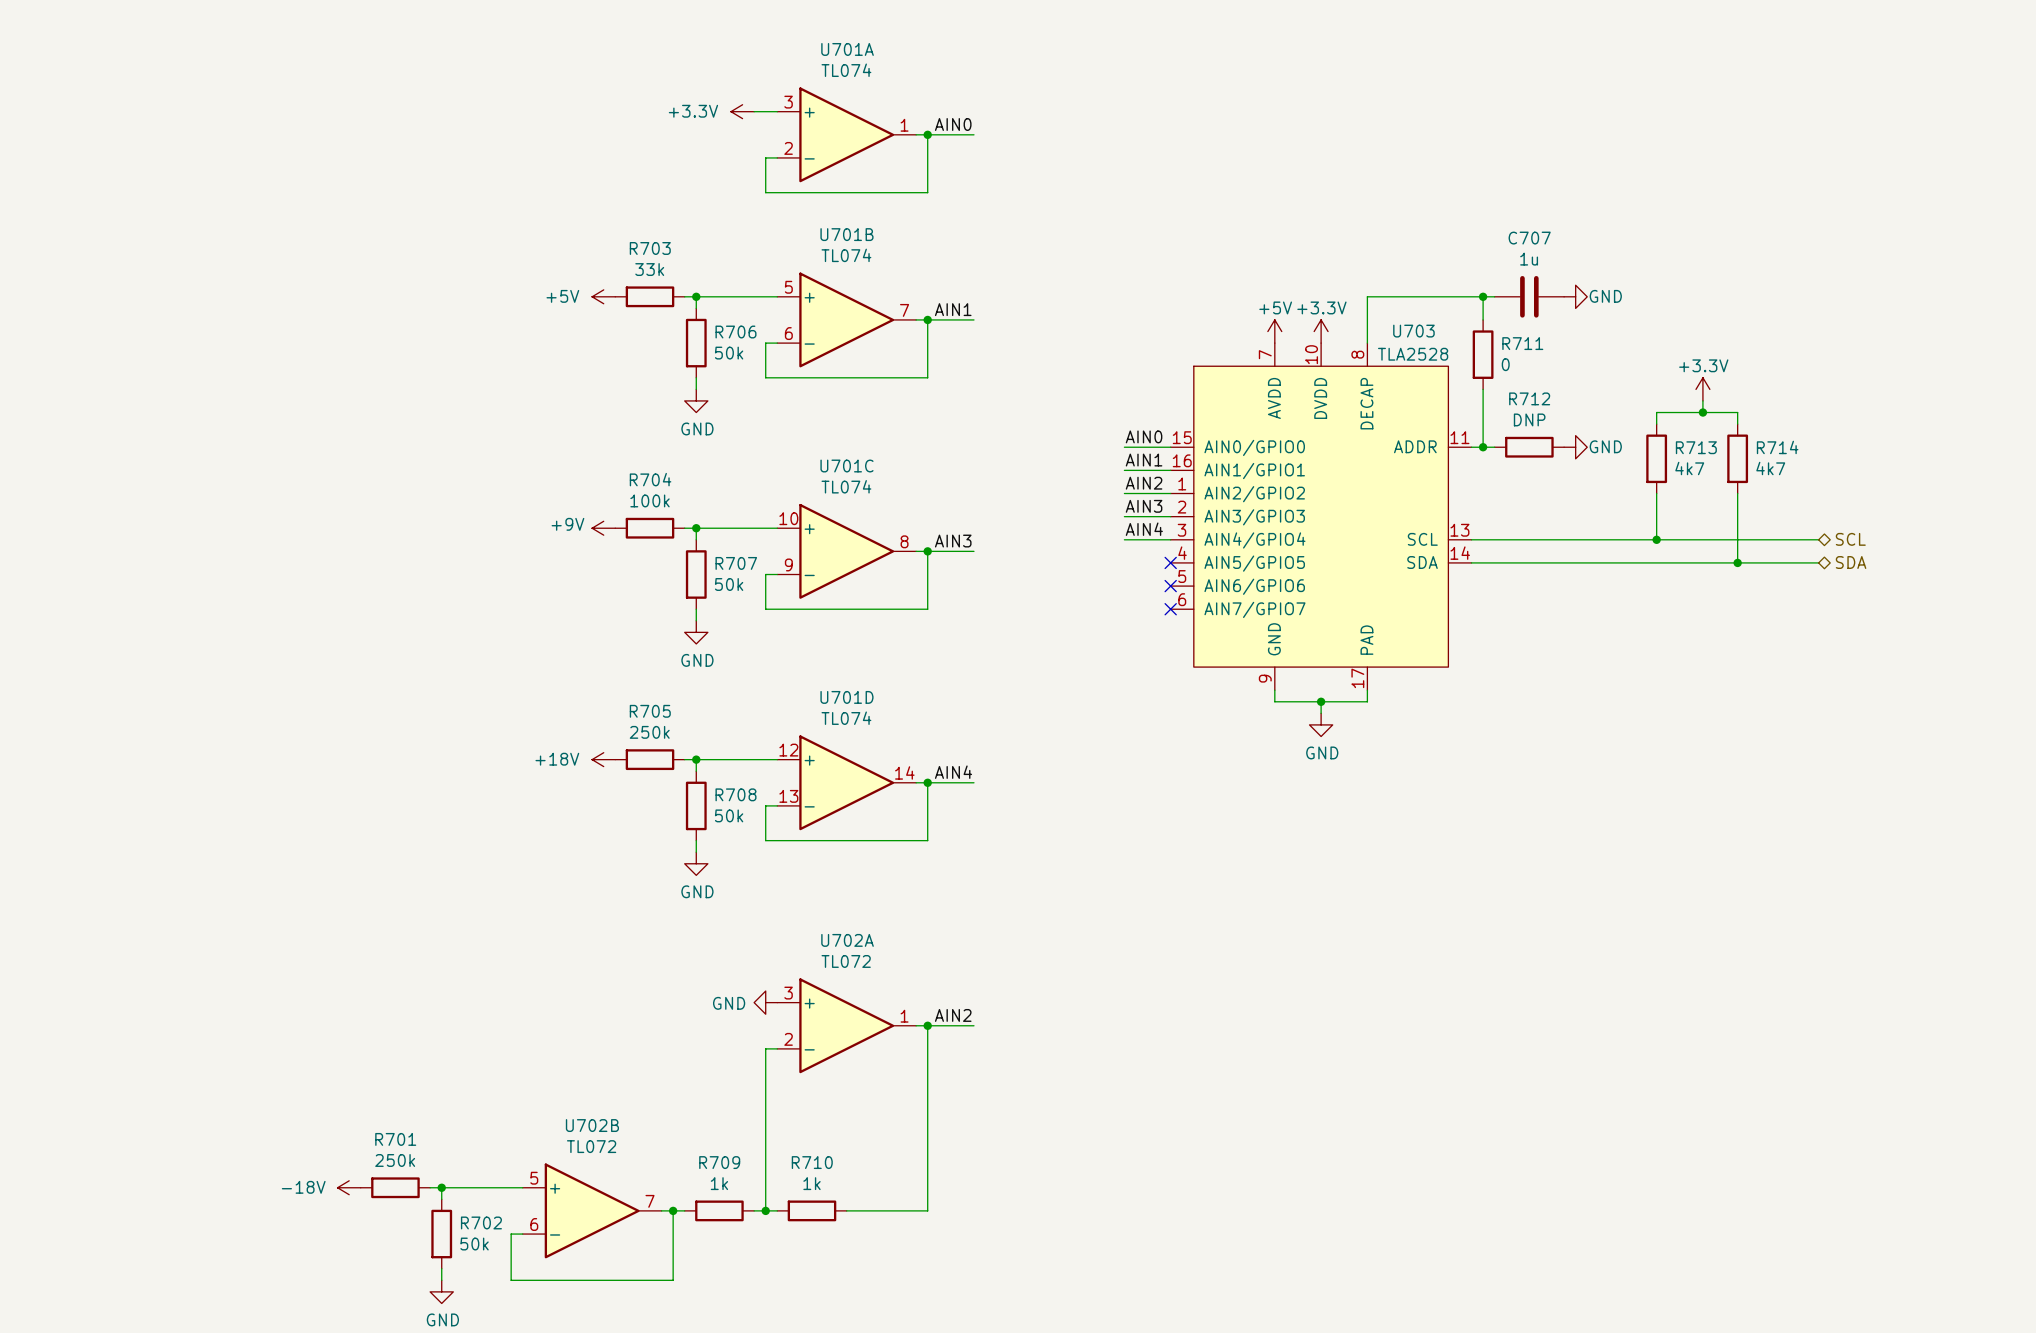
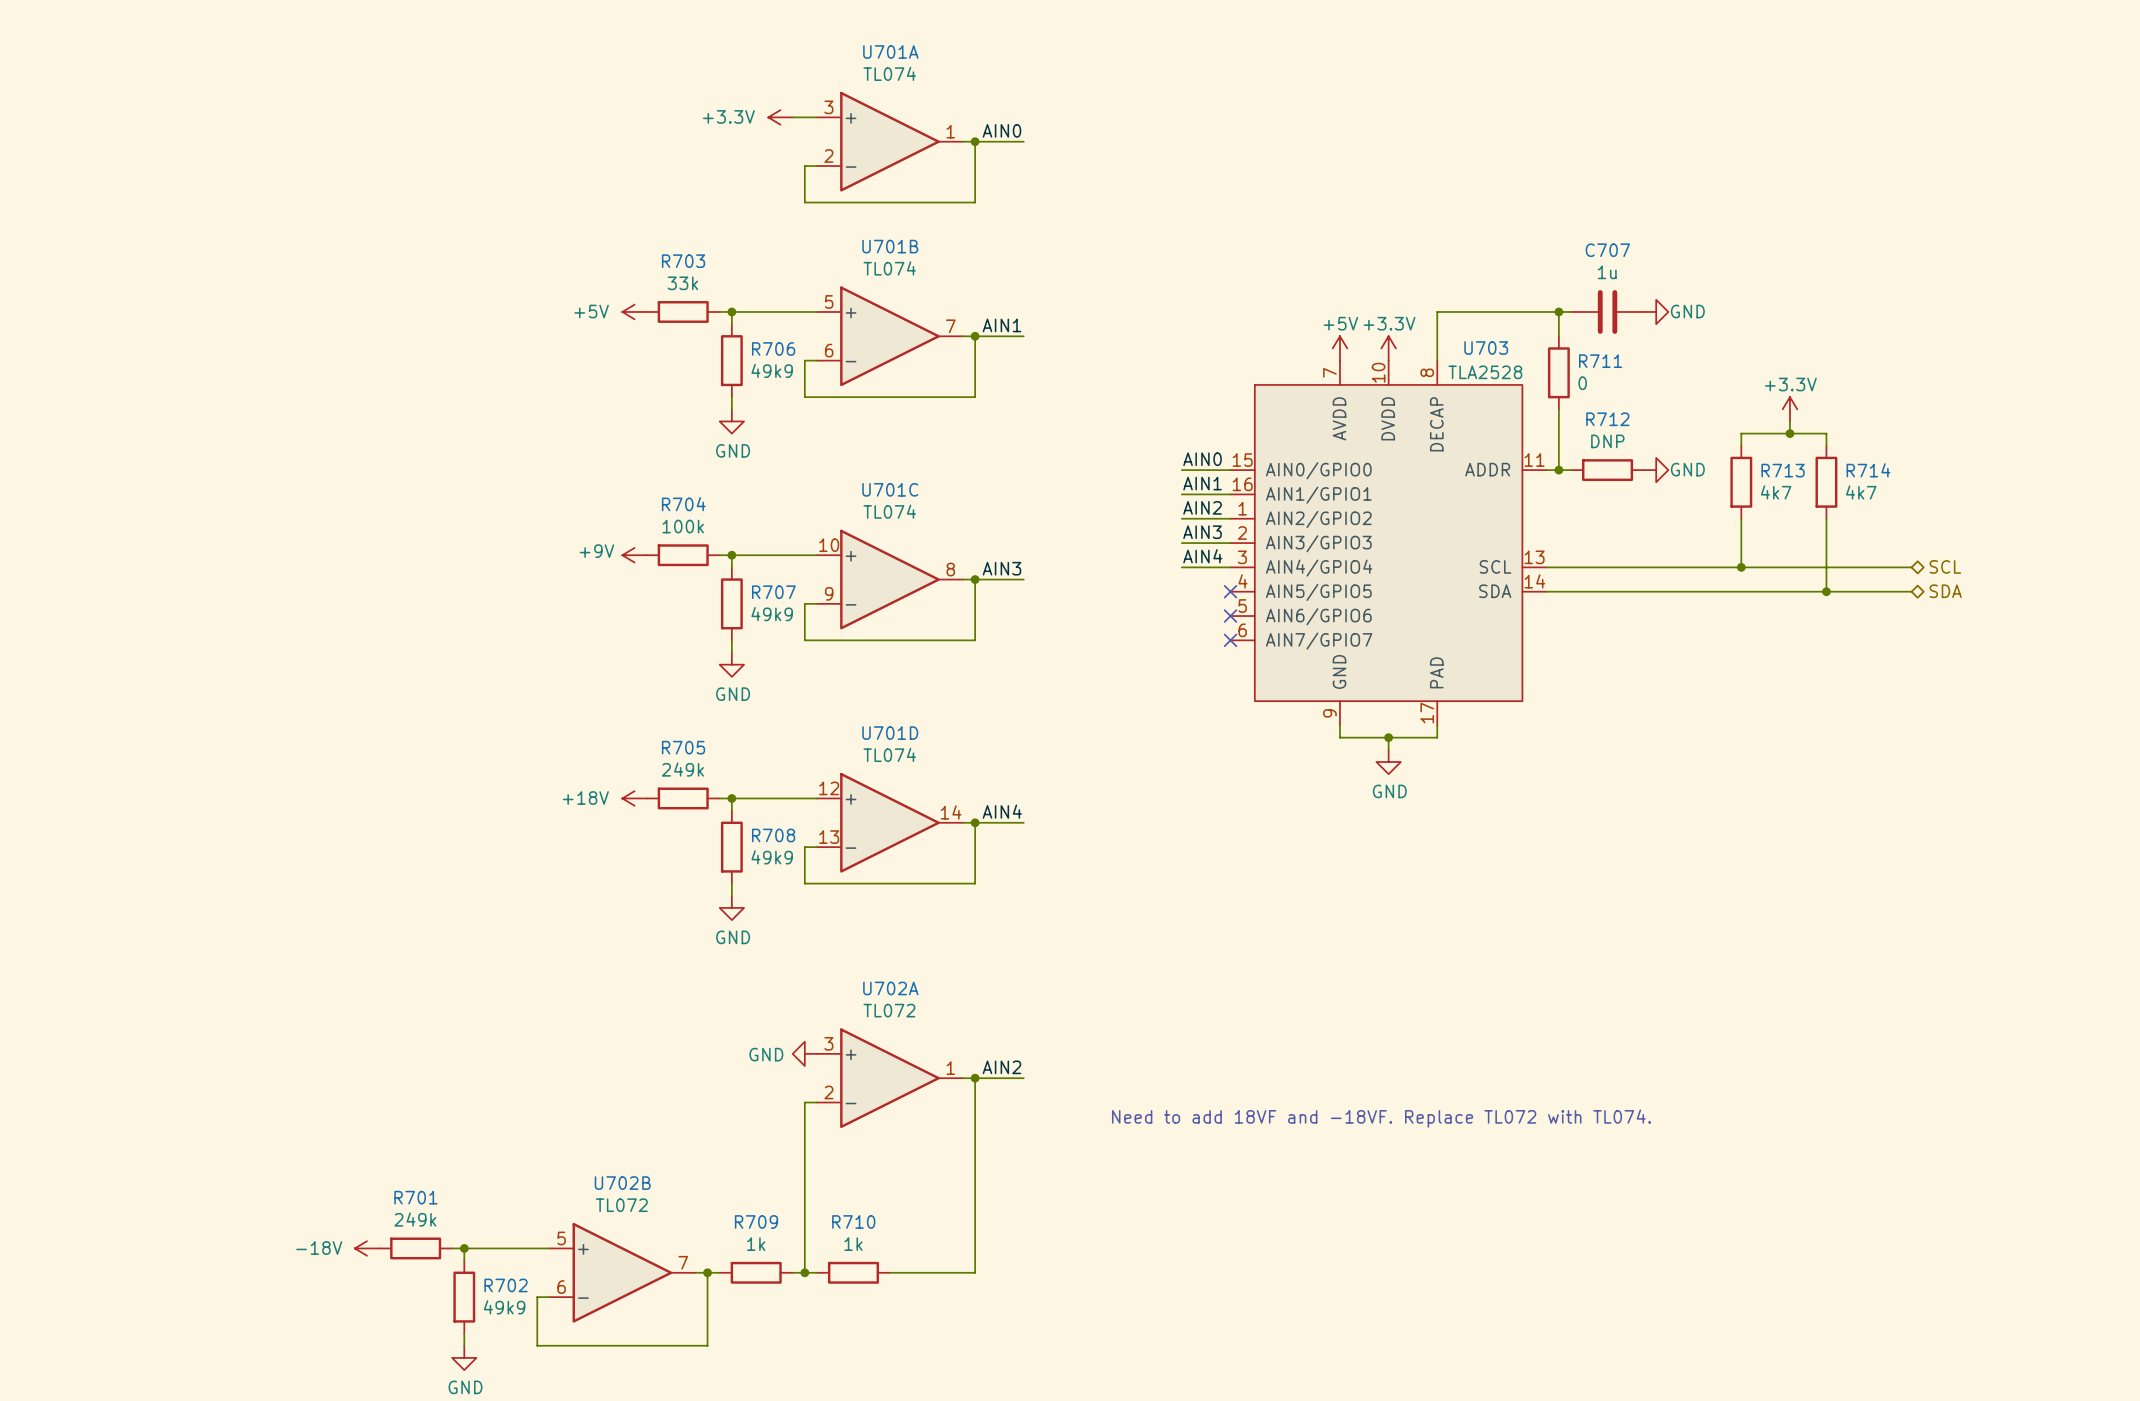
R706 value: 50k (729, 353) -> 49k9 (772, 370)
R707 value: 50k (729, 584) -> 49k9 (772, 614)
R705 value: 250k (649, 732) -> 249k (682, 769)
R708 value: 50k (729, 815) -> 49k9 (772, 857)
text: none -> Need to add 18VF and -18VF. Replace TL072 with TL074. (1381, 1118)
R701 value: 250k (395, 1160) -> 249k (415, 1219)
R702 value: 50k (474, 1244) -> 49k9 (504, 1307)

